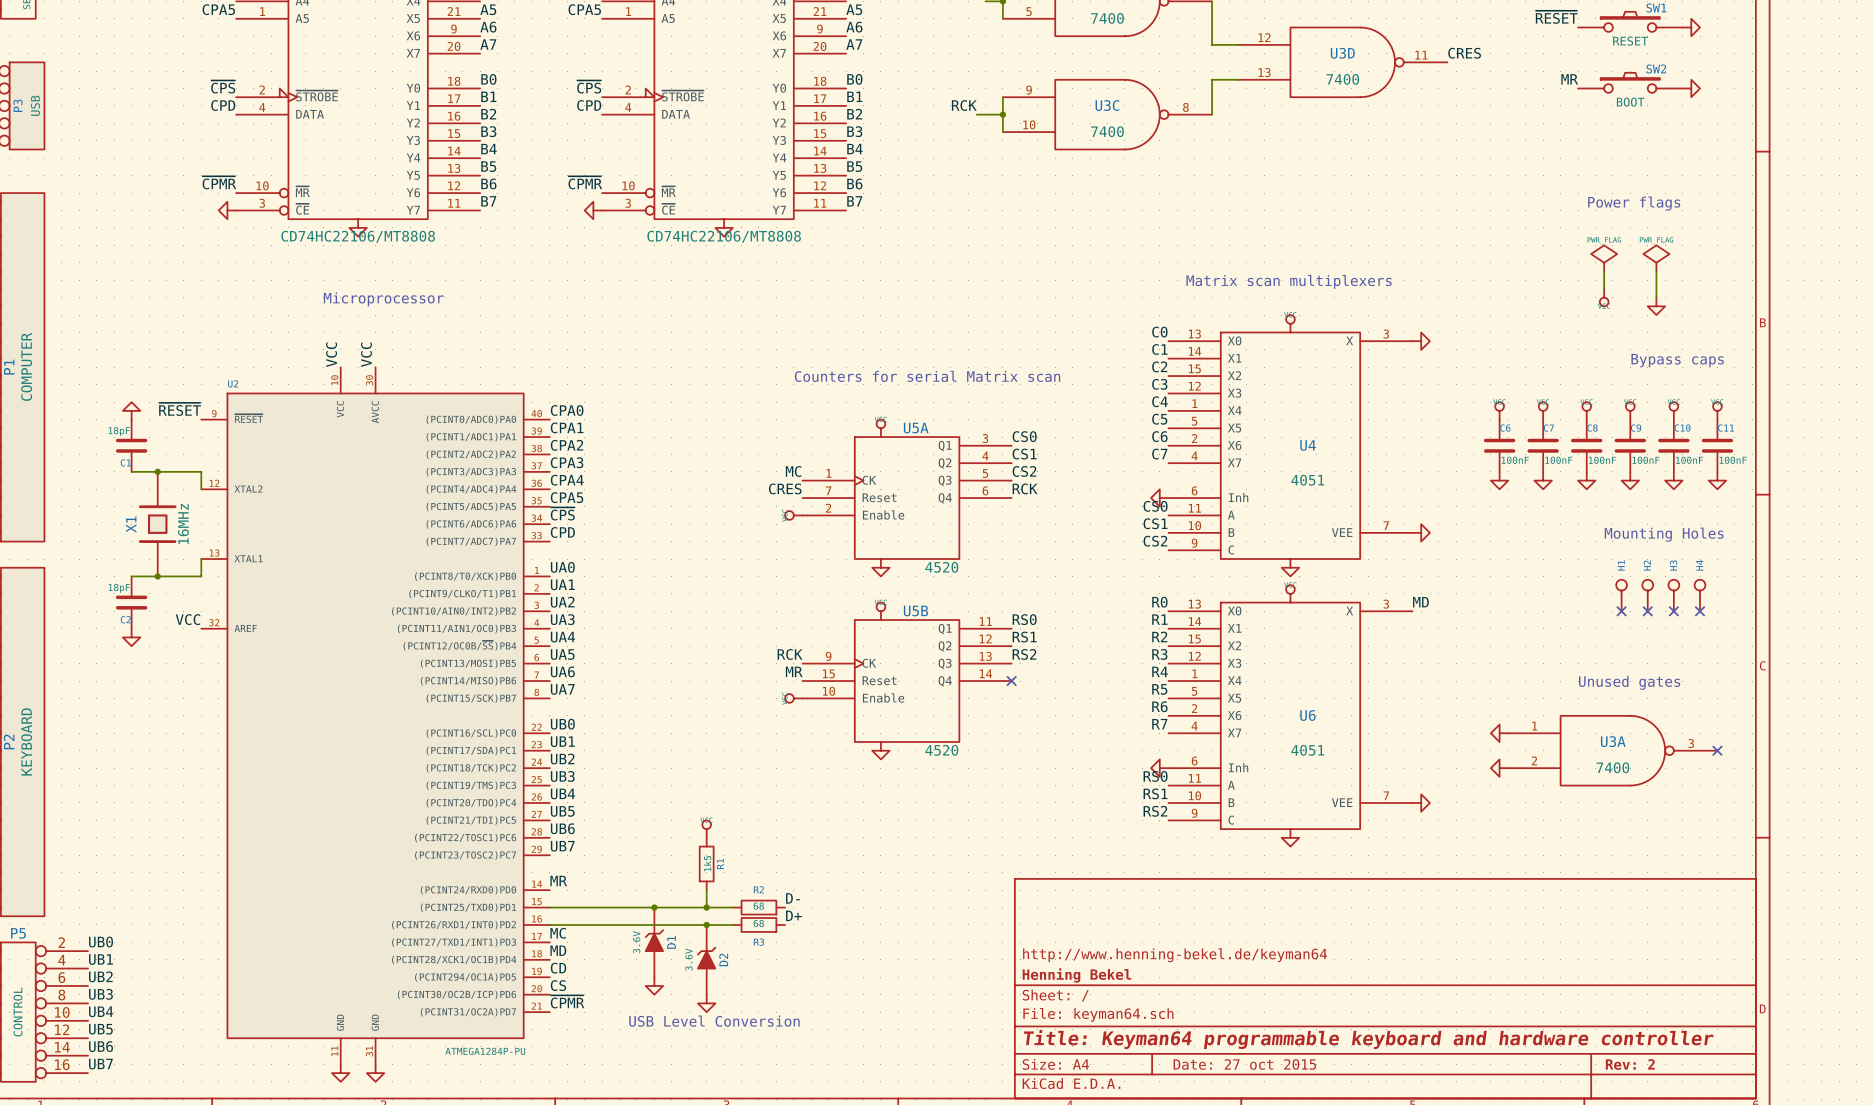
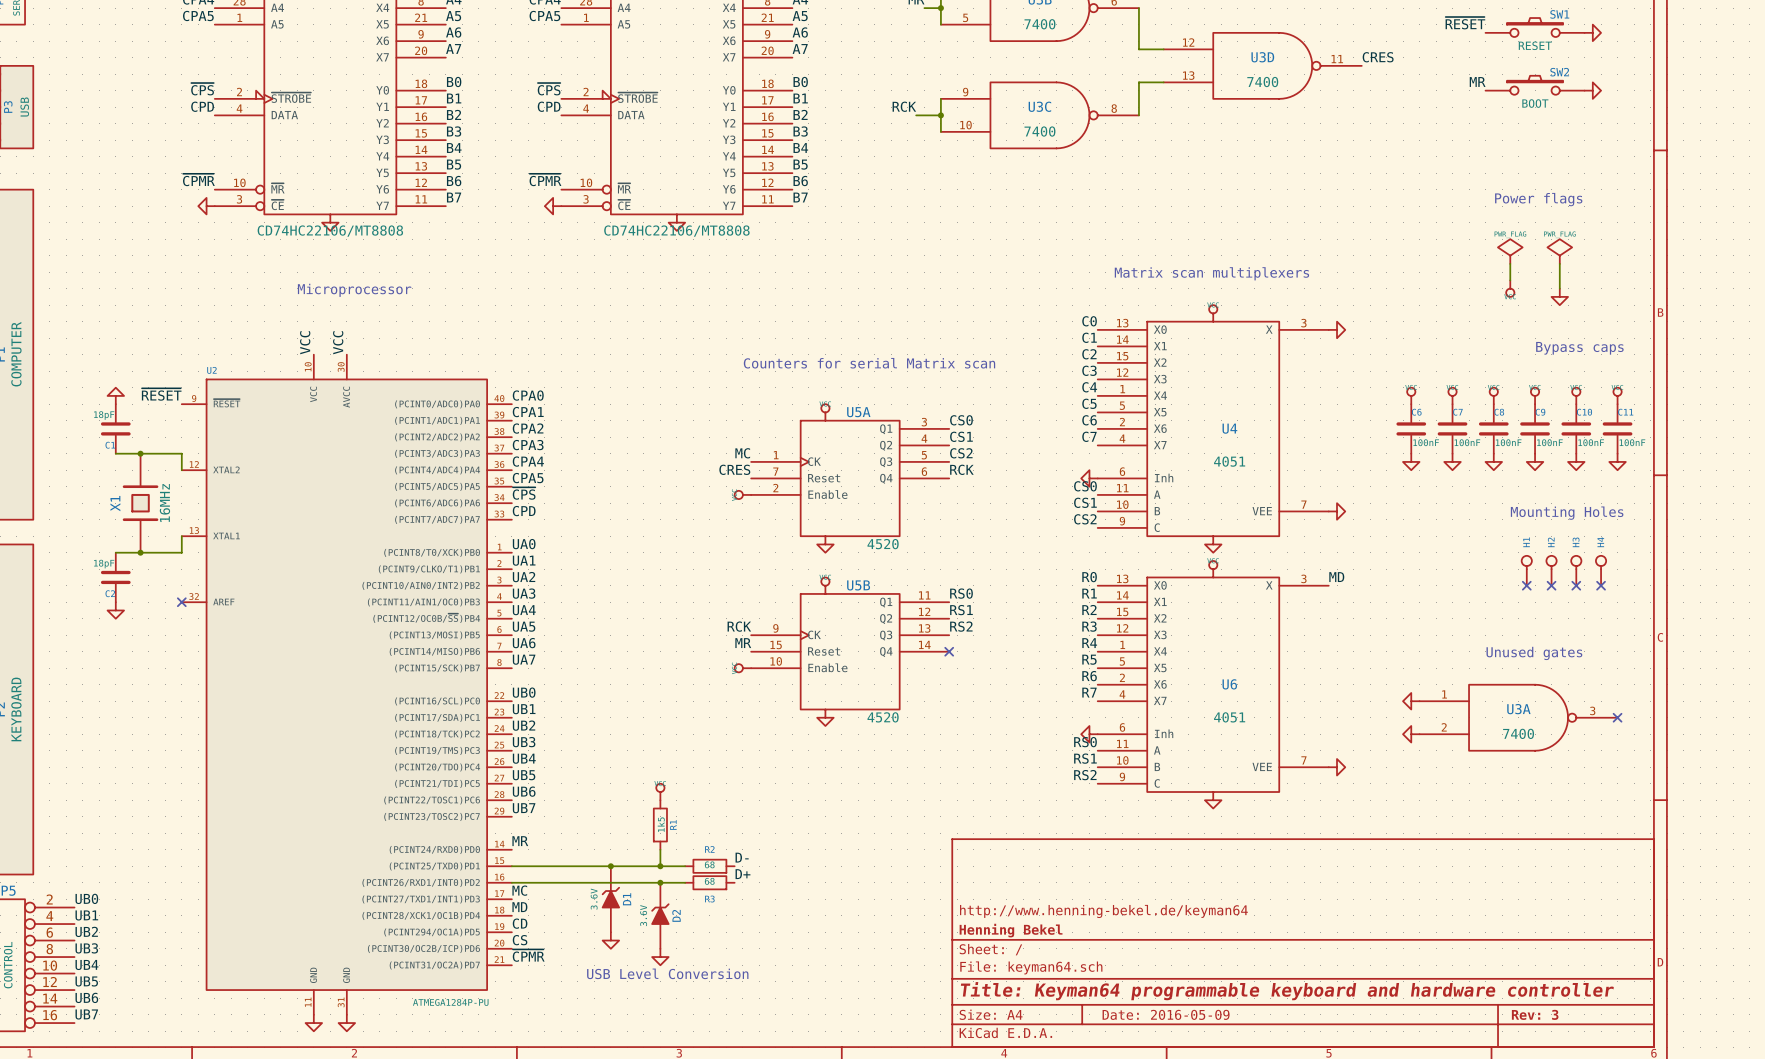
label: VCC (187, 619) -> none
no-connect mark: none -> (181, 602)
title block: Date: 27 oct 2015 (1244, 1064) -> Date: 2016-05-09 (1166, 1014)
title block: Rev: 2 (1630, 1064) -> Rev: 3 (1535, 1014)

